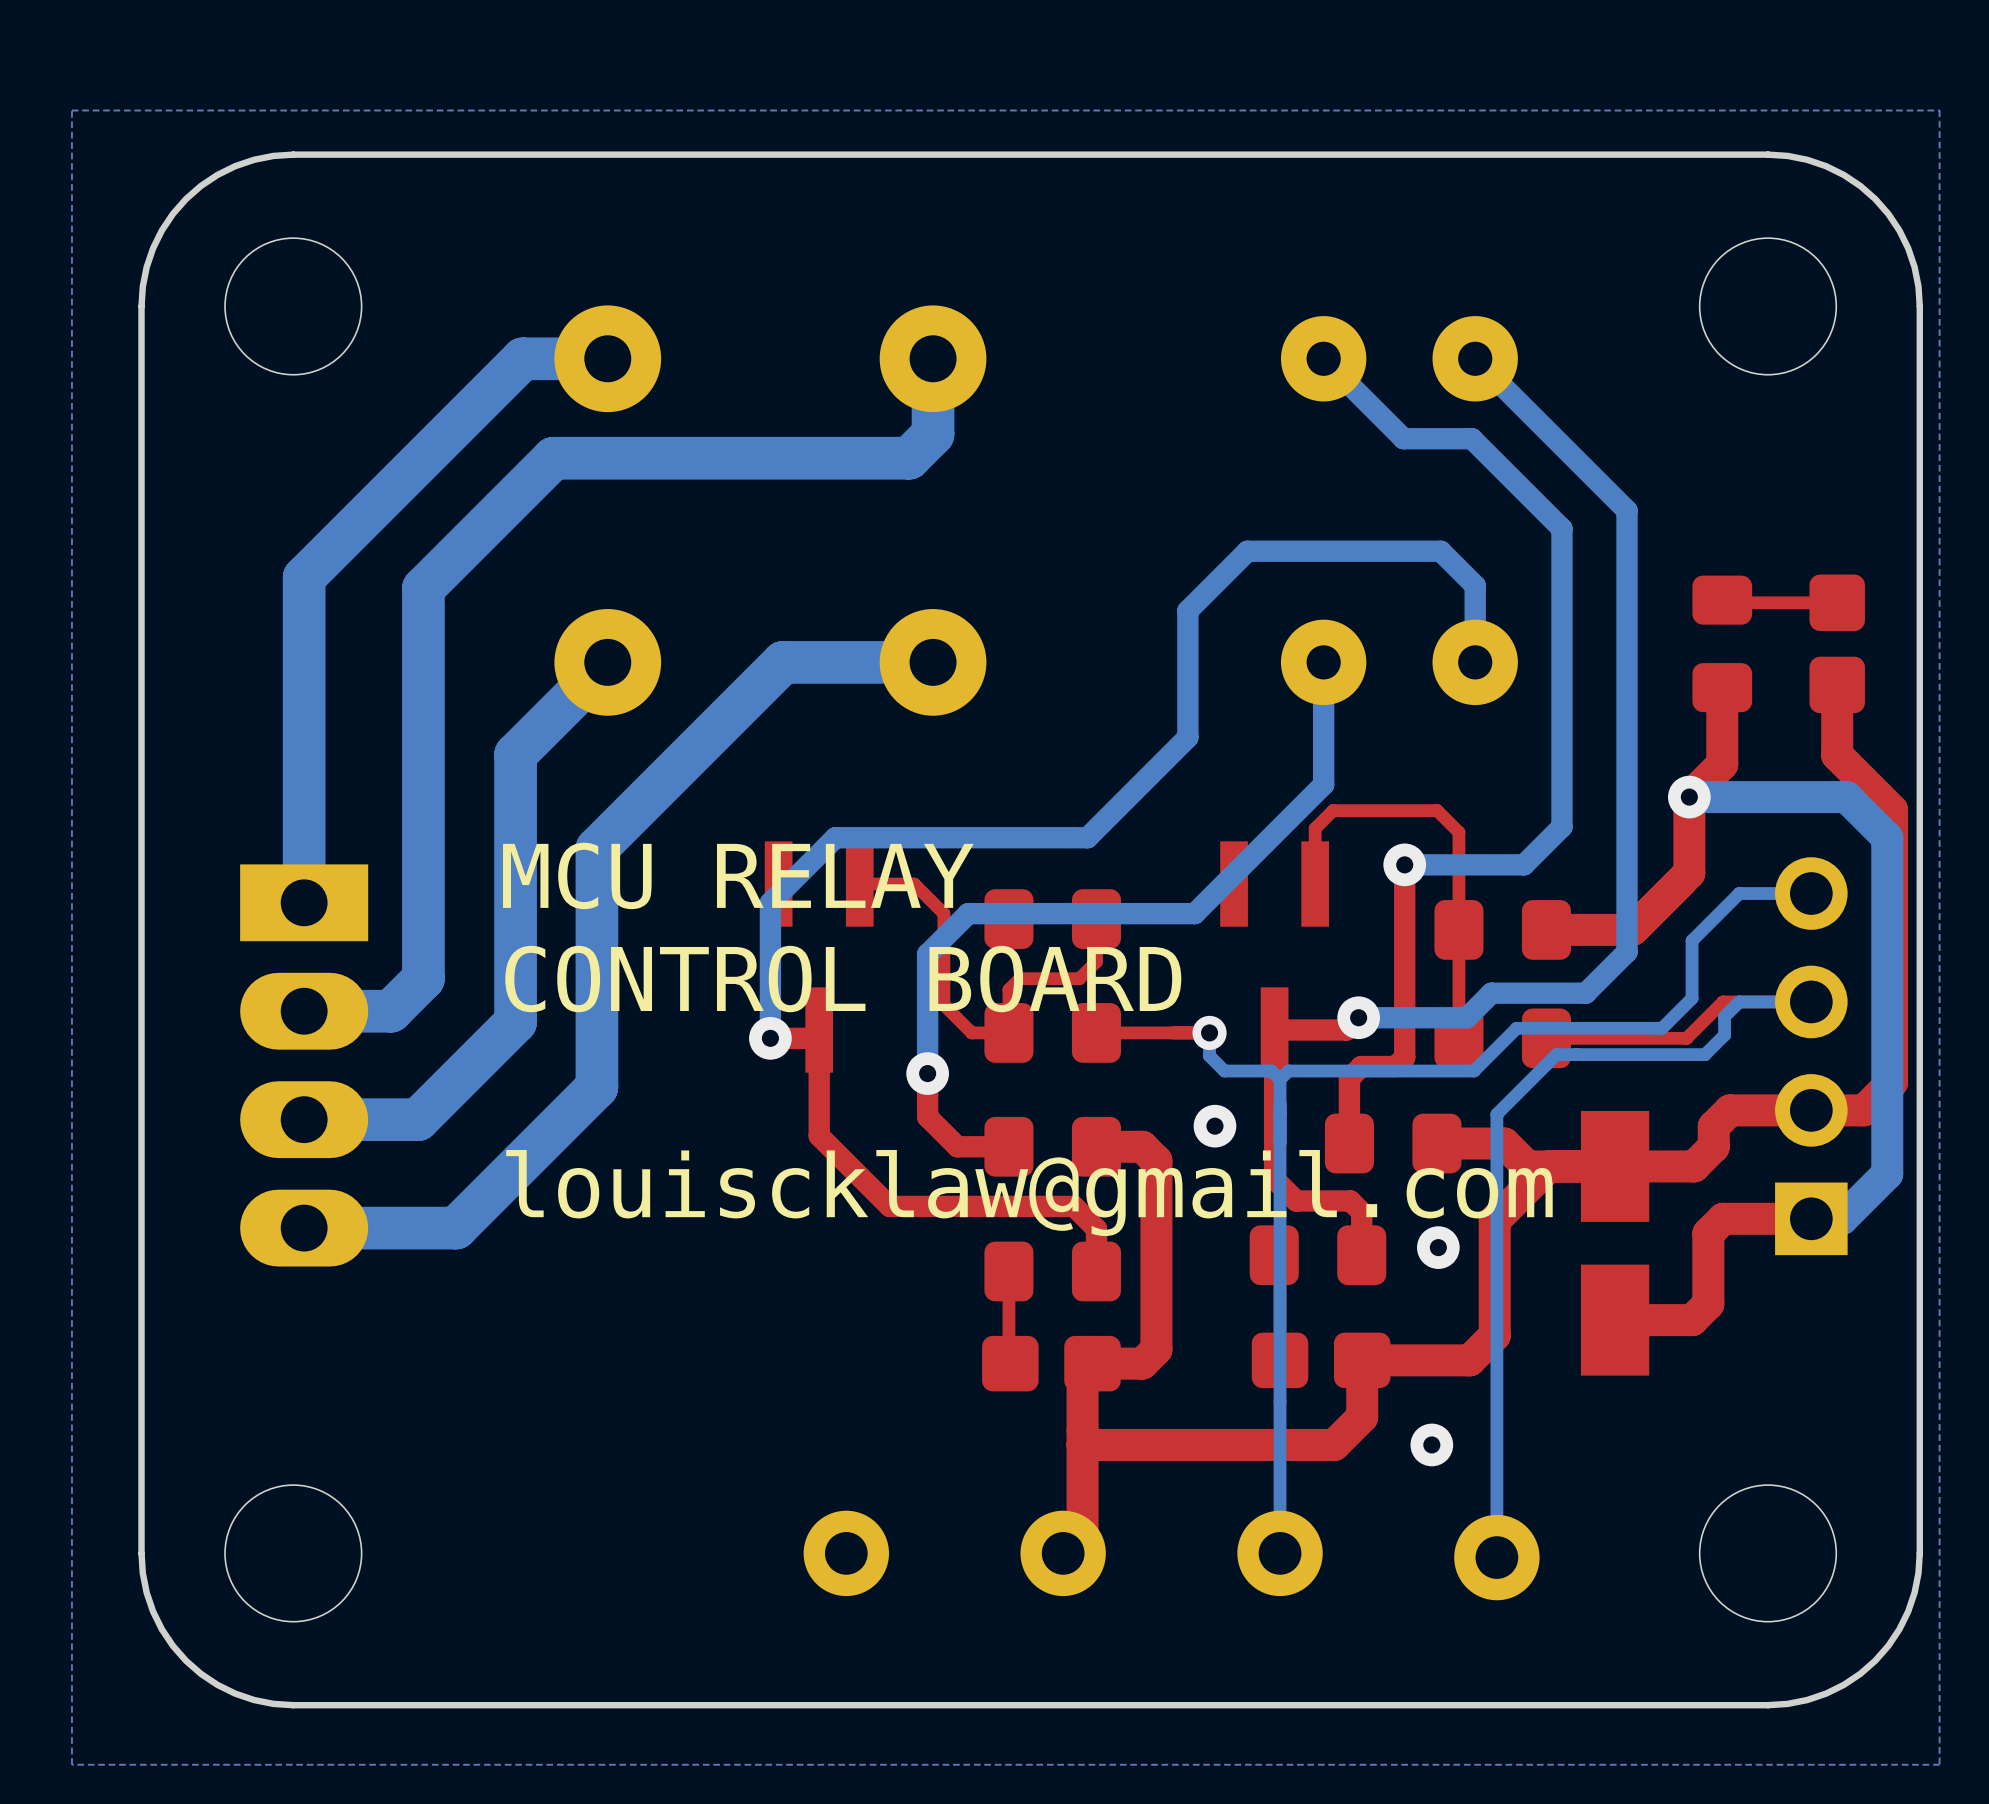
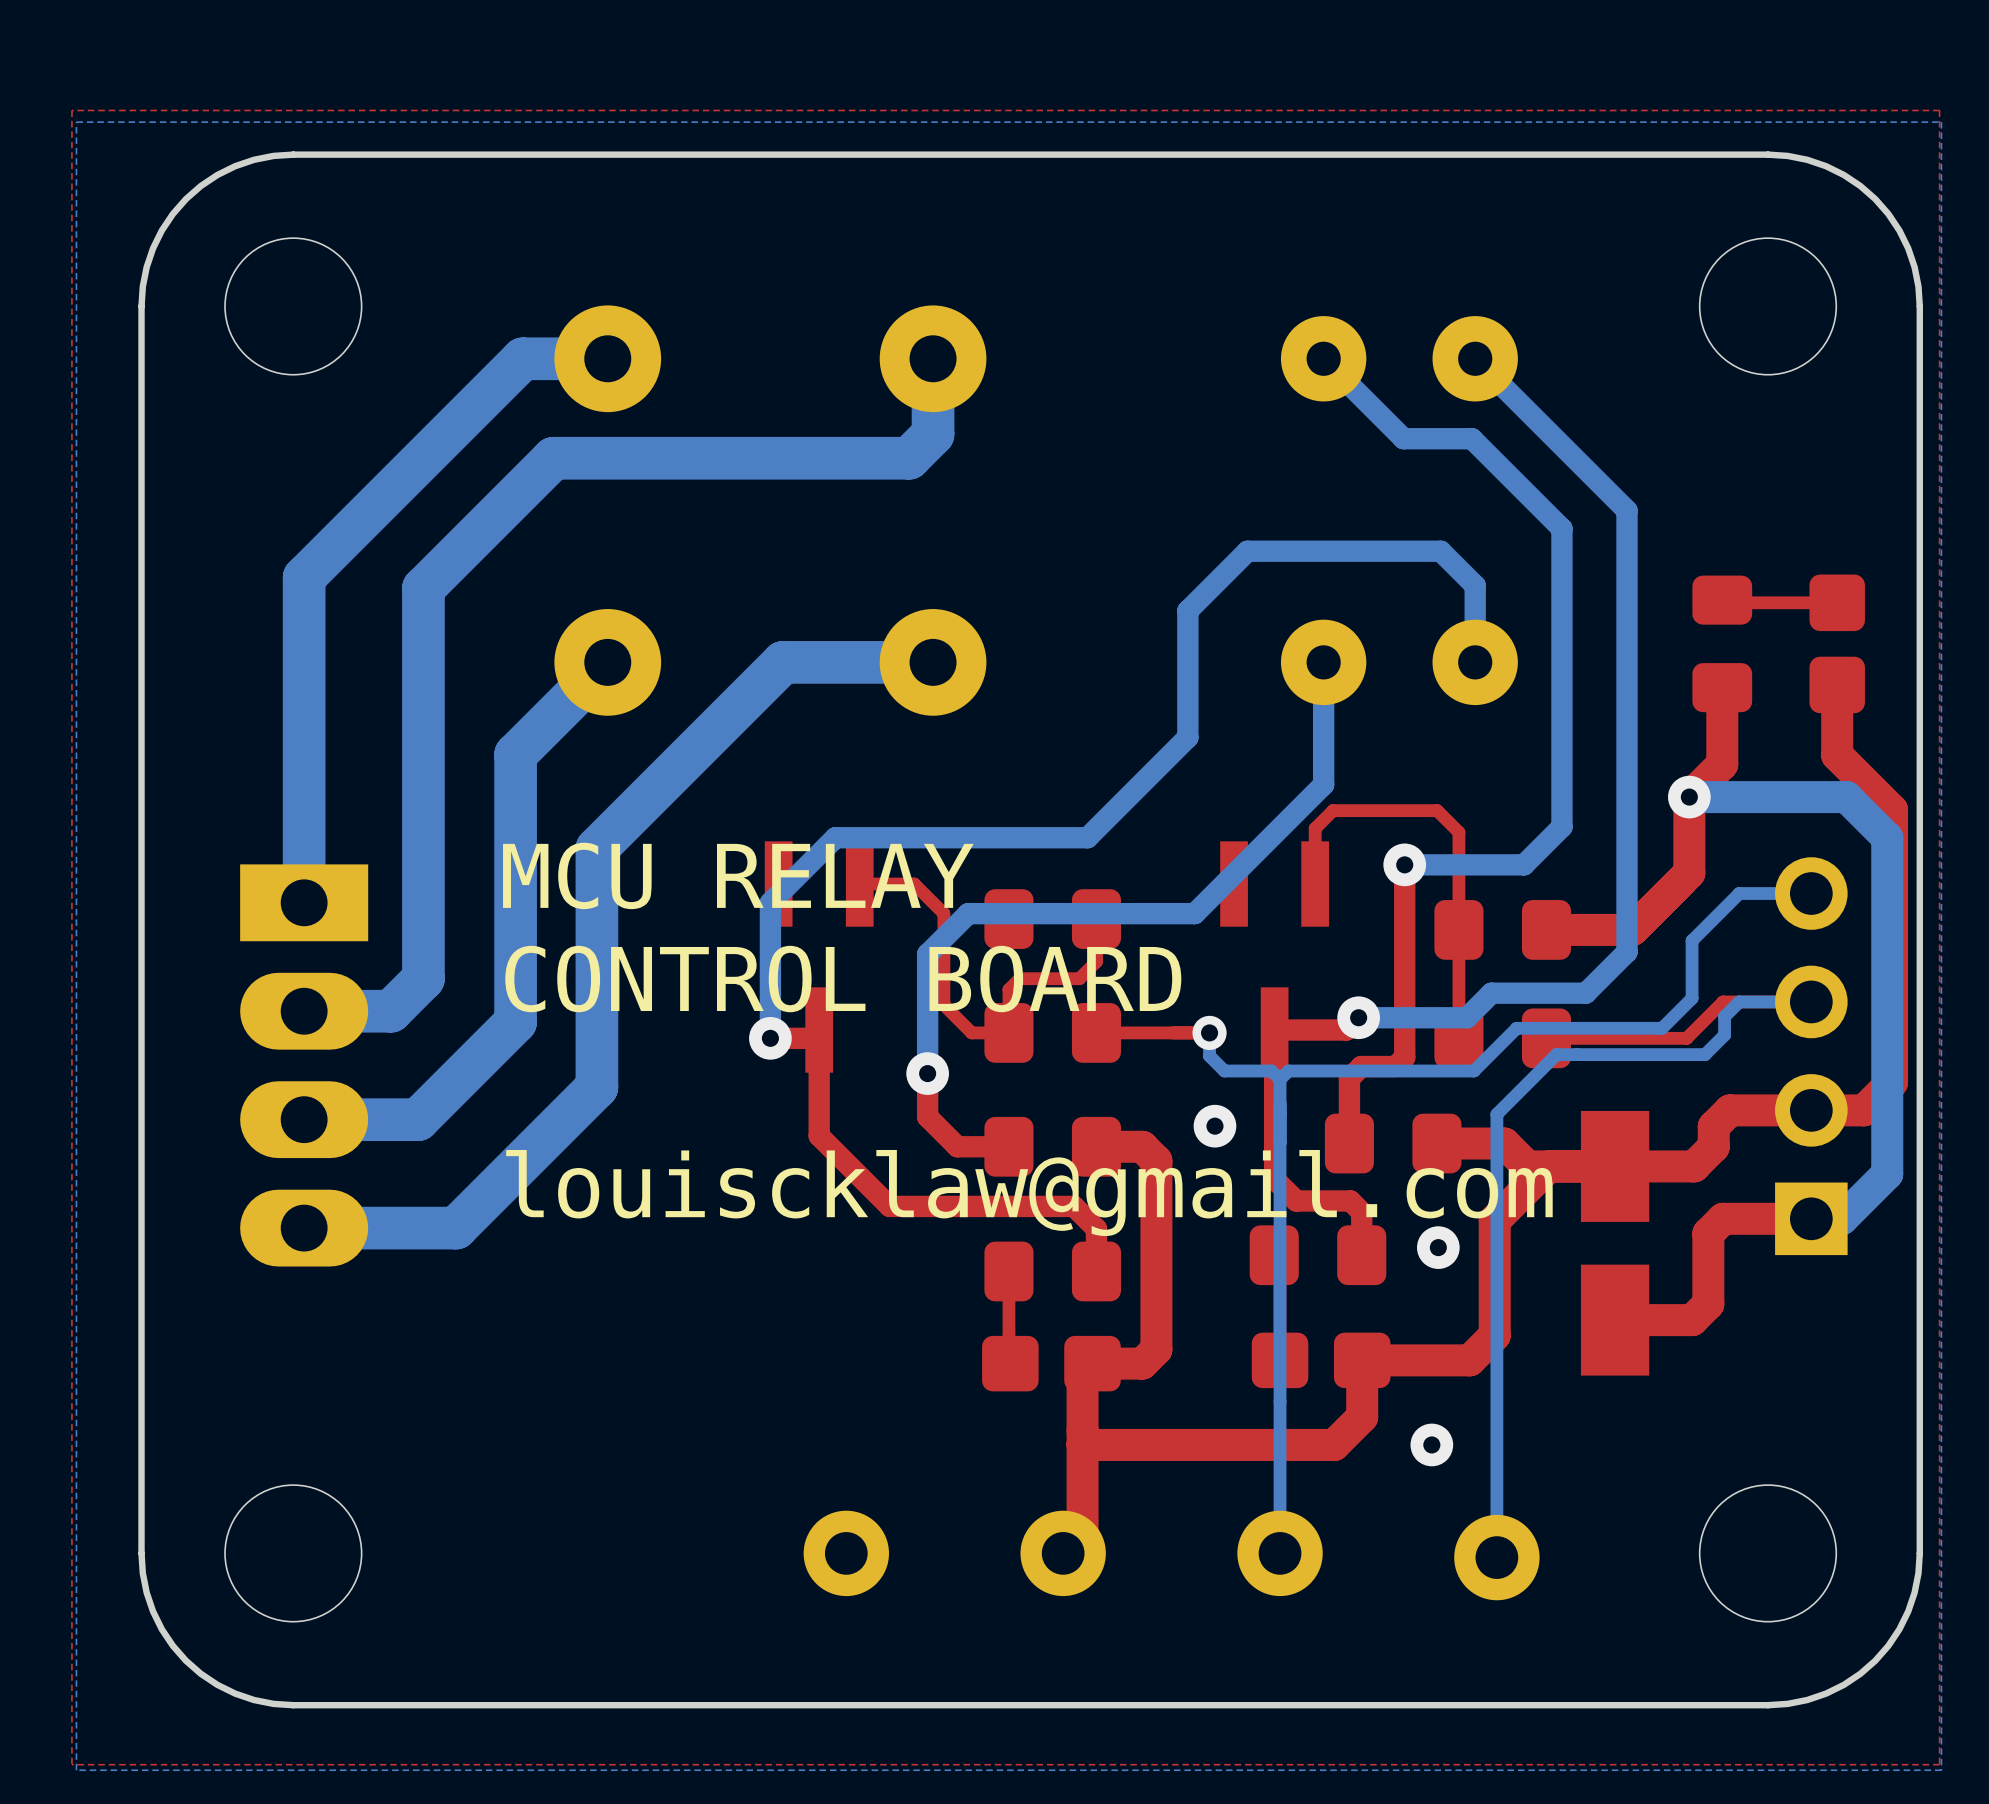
bottom zone outline: (1939, 110) (1939, 1764) (71, 1764) (71, 110) (1939, 110) -> (1941, 122) (1941, 1770) (76, 1770) (76, 122) (1941, 122)

